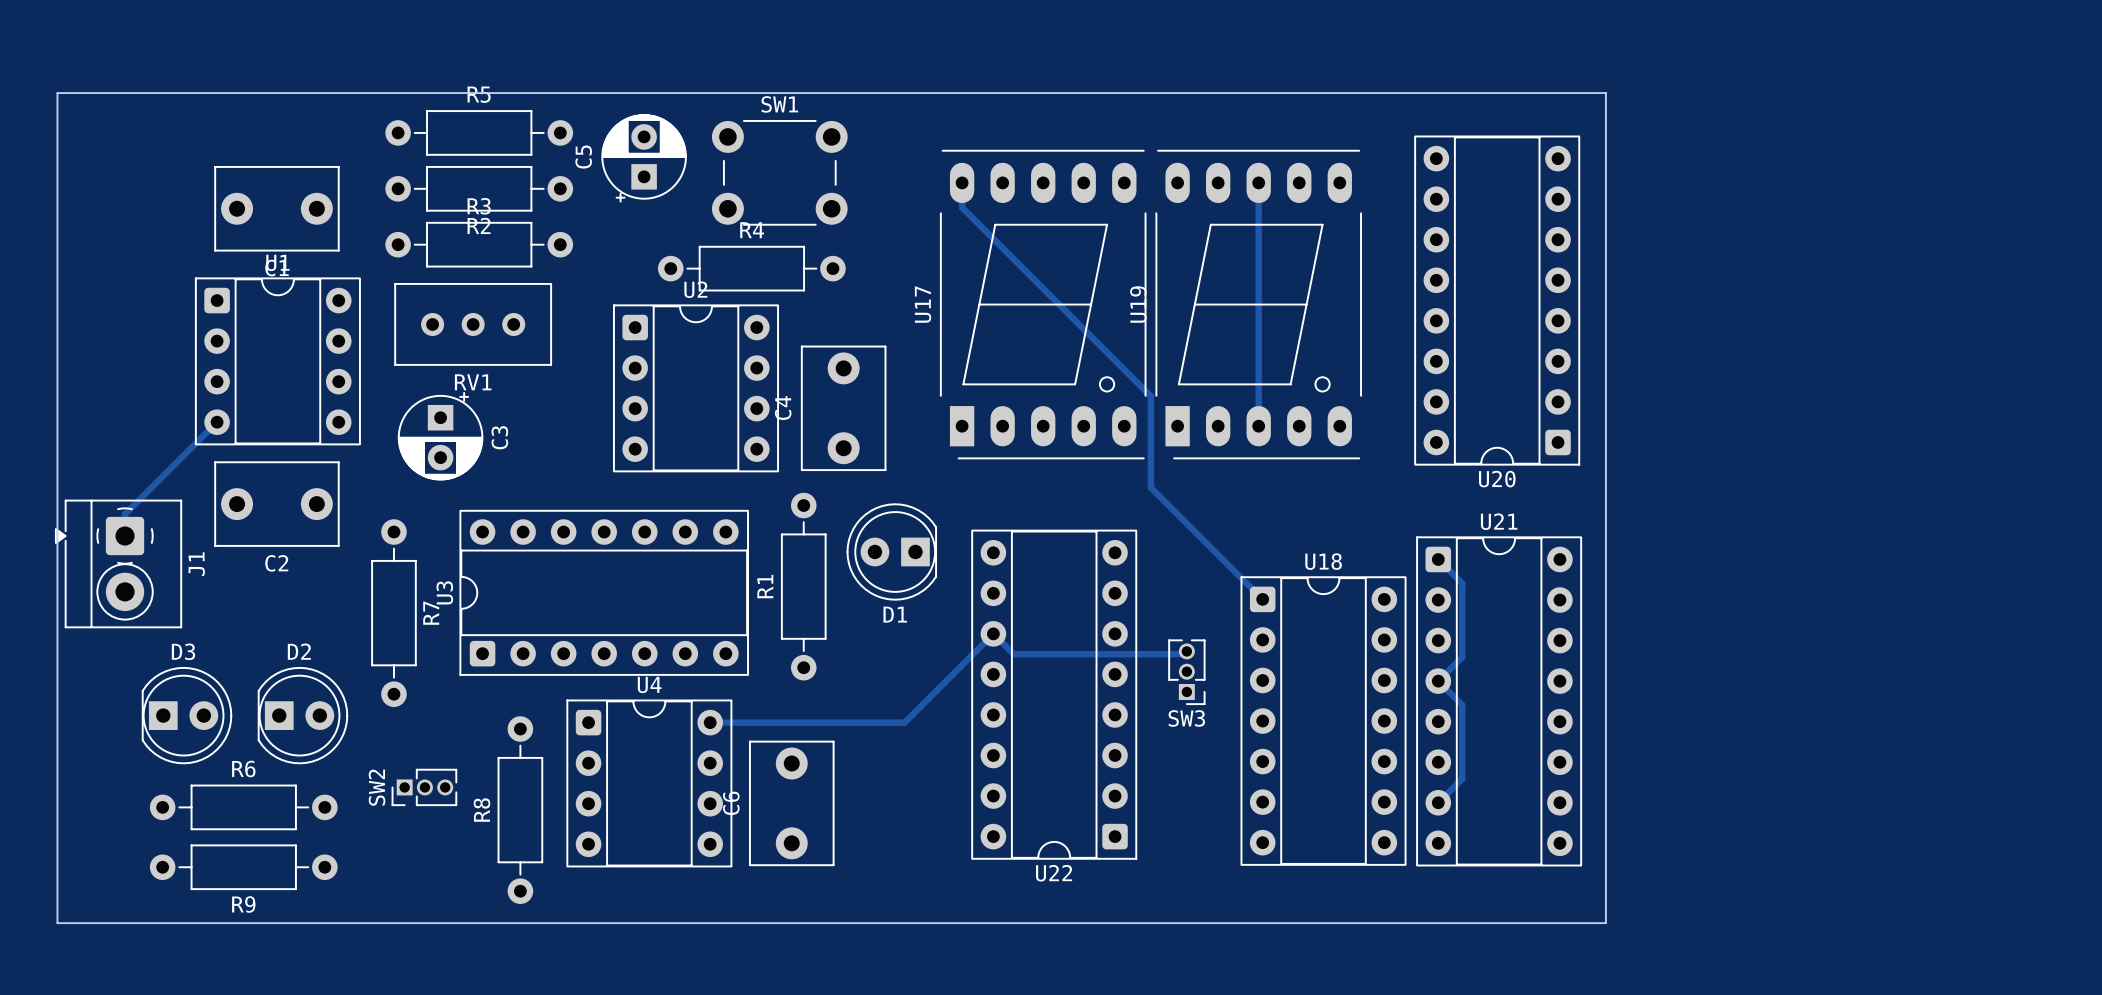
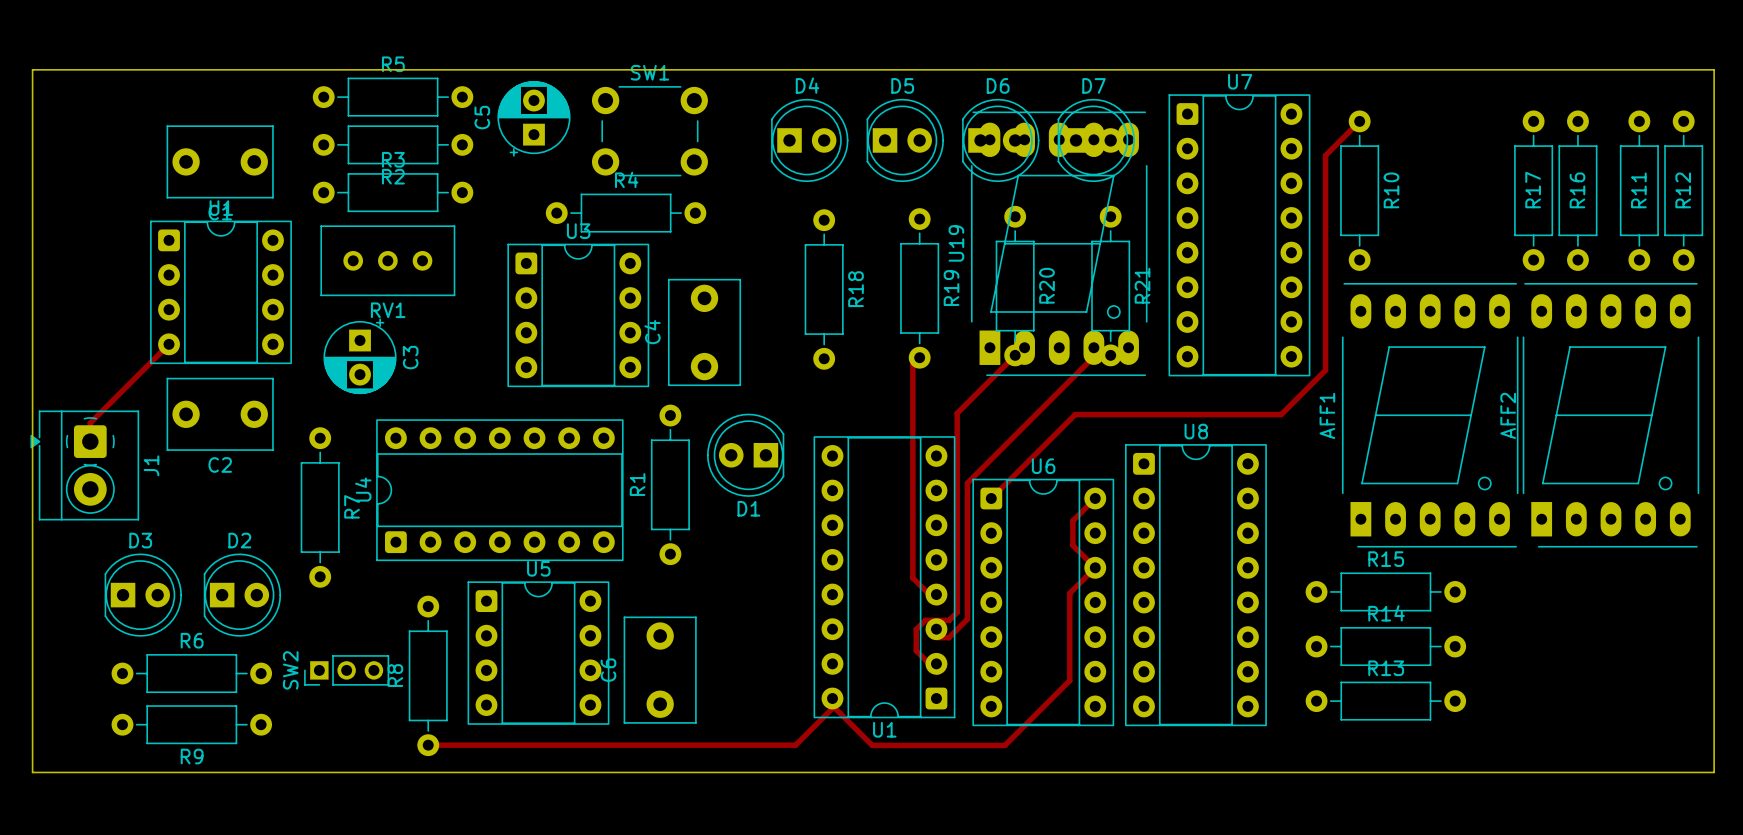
board edge: (57, 101) (57, 93) (1605, 93) (1605, 923) -> (32, 69) (1714, 69) (1714, 772) (1355, 772)
track: none -> (1359, 121) (1325, 155) (1325, 370) (1281, 414) (1075, 414) (991, 498)
track: (962, 182) (962, 207) (1150, 396) (1150, 487) (1262, 599) -> none
track: (1258, 182) (1258, 426) -> none
D4: none -> (809, 140)
D5: none -> (905, 140)
D6: none -> (1000, 140)
D7: none -> (1096, 140)
R10: none -> (1359, 190)
R17: none -> (1533, 190)
R16: none -> (1577, 190)
R11: none -> (1639, 190)
R12: none -> (1683, 190)
U2 name: U2 (695, 289) -> U3 (578, 231)
U7: none -> (1239, 235)
U20: (1497, 300) -> none
U17: (1043, 304) -> none
R20: none -> (1015, 286)
R21: none -> (1110, 286)
R19: none -> (919, 288)
R18: none -> (824, 289)
track: none -> (1015, 355) (957, 413) (957, 612) (949, 620) (925, 620) (916, 629) (916, 650) (937, 672)
track: none -> (1110, 355) (1095, 355) (967, 483) (967, 619) (949, 637) (937, 637)
track: none -> (919, 357) (912, 364) (912, 578) (937, 603)
AFF1: none -> (1430, 415)
AFF2: none -> (1610, 415)
track: (1438, 559) (1462, 583) (1462, 657) (1438, 681) (1462, 705) (1462, 778) (1438, 802) -> none
U3 name: U3 (444, 592) -> U4 (363, 489)
track: none -> (1095, 498) (1072, 520) (1072, 545) (1095, 567) (1069, 593) (1069, 680) (1004, 745) (872, 745) (833, 706) (795, 745) (428, 745)
track: (1186, 651) (1184, 654) (1013, 654) (993, 633) (904, 722) (710, 722) -> none
SW3: (1186, 672) -> none
U4 name: U4 (649, 684) -> U5 (538, 568)
U21: (1499, 701) -> none
U8: none -> (1195, 585)
R15: none -> (1385, 591)
U18: (1323, 721) -> none
U6: none -> (1043, 602)
SW2 footprint: [391, 768, 458, 807] -> [304, 655, 390, 686]
R14: none -> (1385, 646)
R13: none -> (1385, 701)
U22 name: U22 (1054, 873) -> U1 (884, 729)

